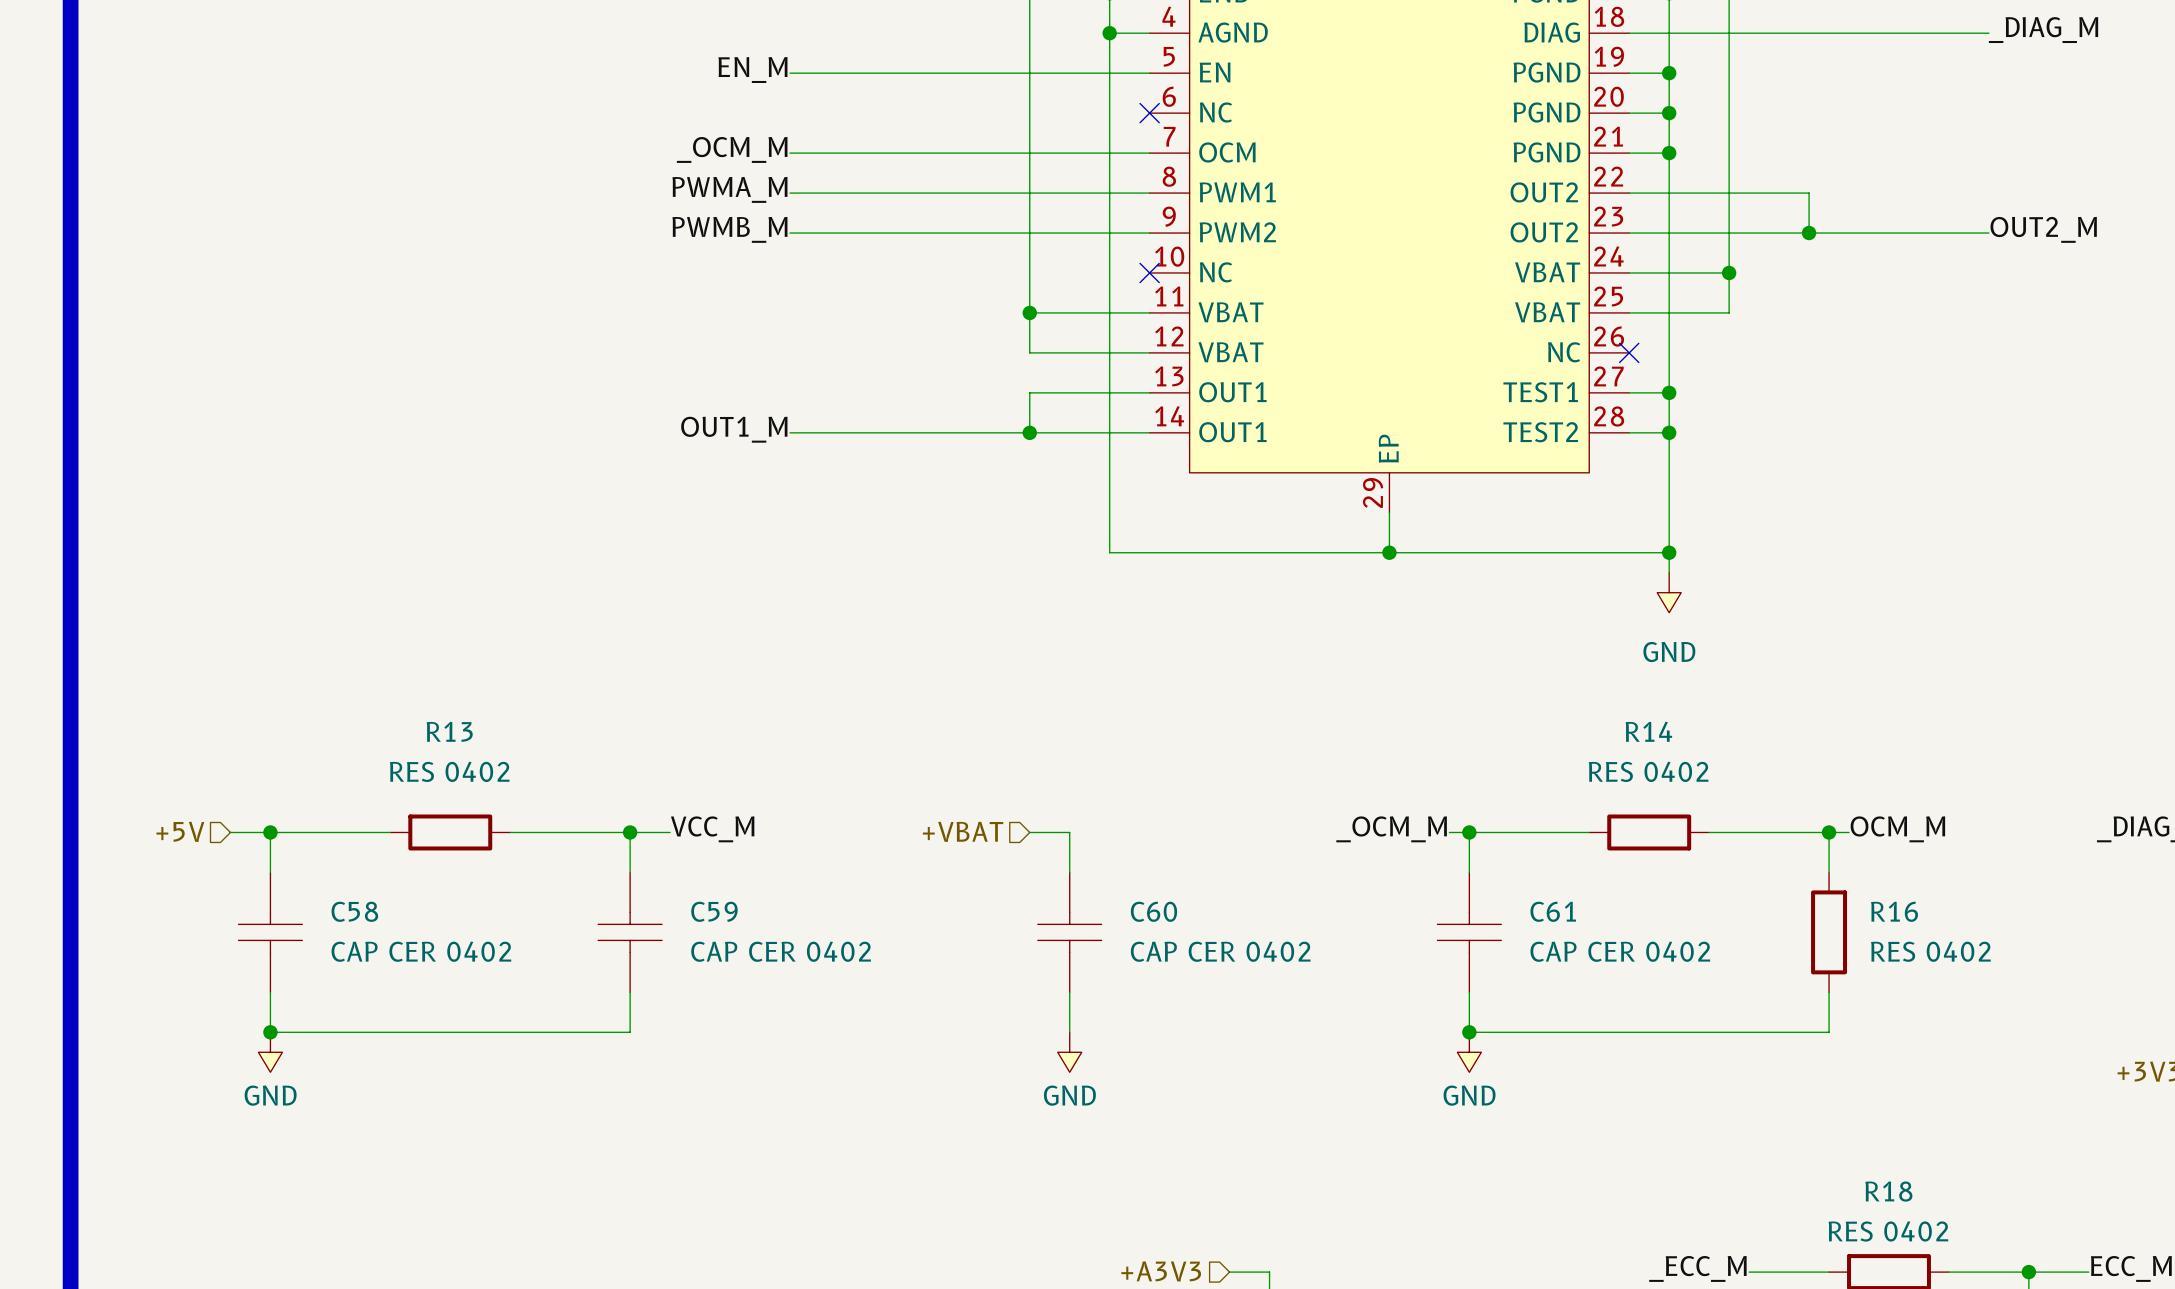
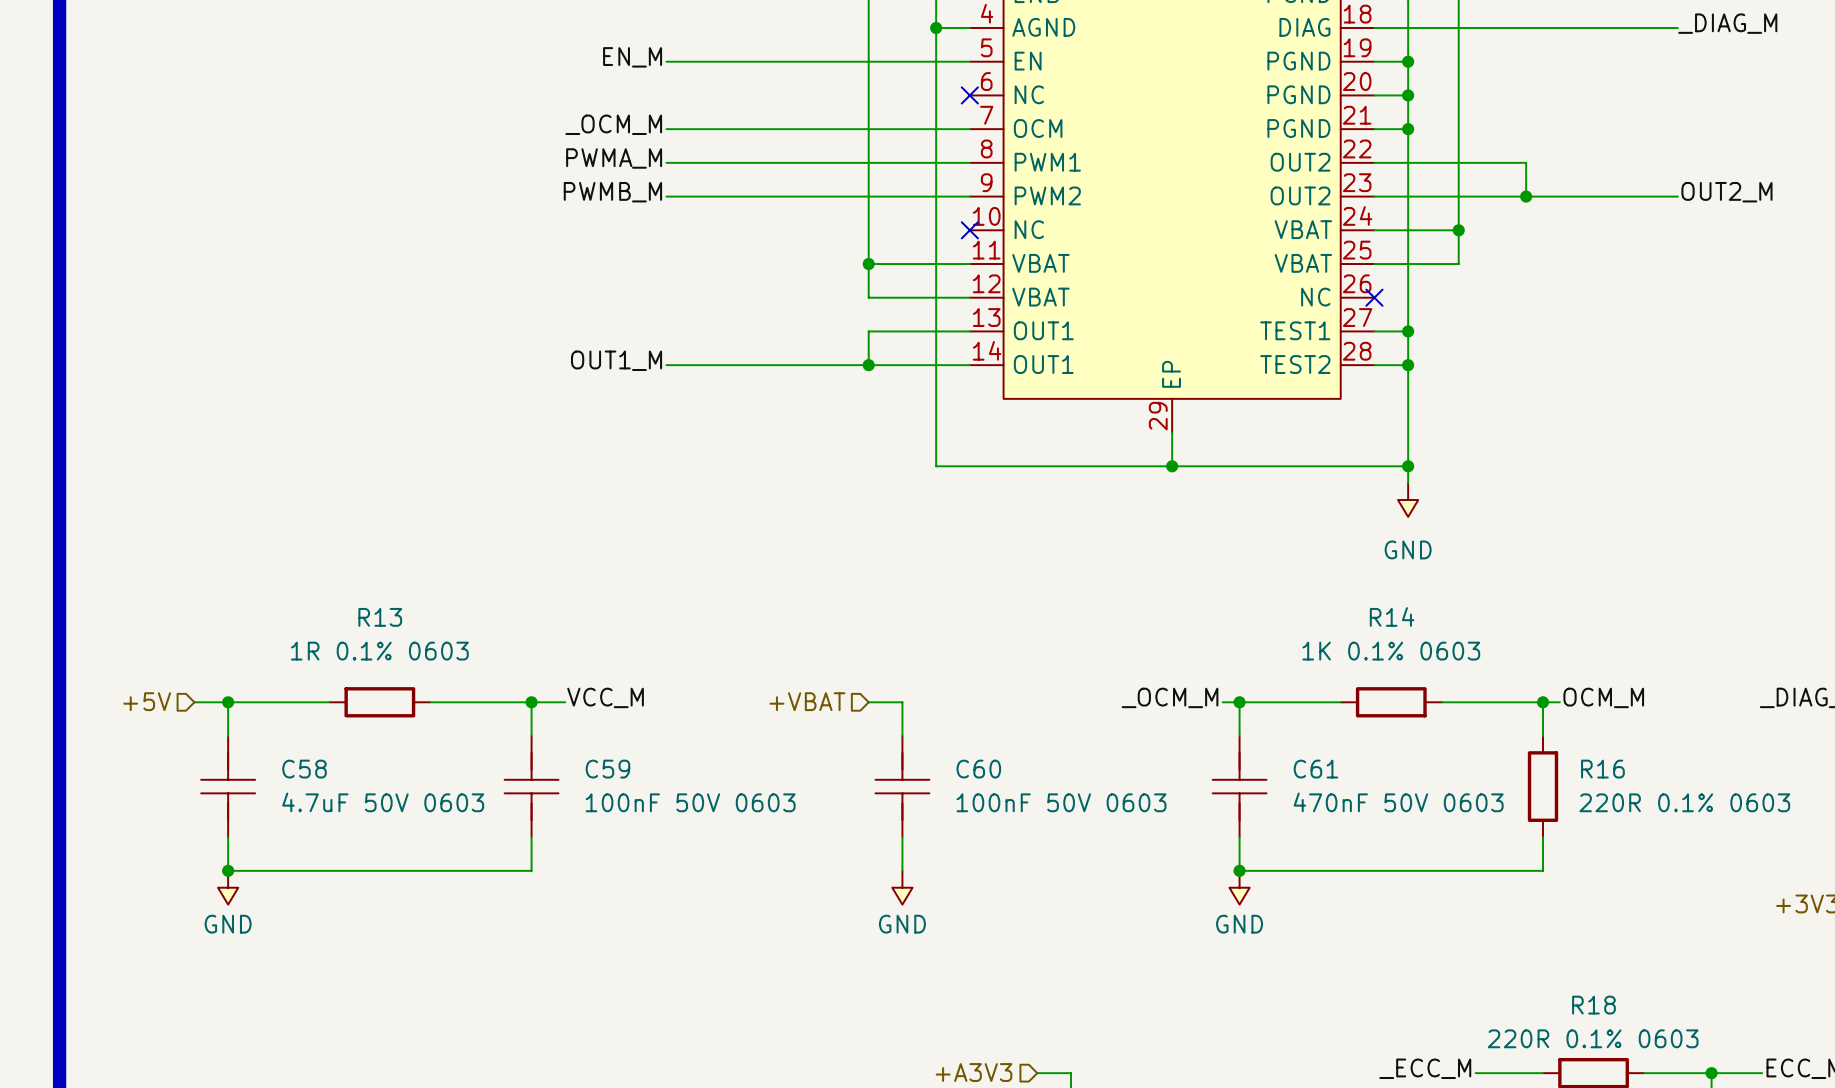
R13 value: RES 0402 (449, 771) -> 1R 0.1% 0603 (379, 651)
R14 value: RES 0402 (1648, 771) -> 1K 0.1% 0603 (1391, 651)
C58 symbol: [238, 872, 303, 993] -> [201, 736, 256, 838]
C59 symbol: [598, 872, 663, 993] -> [504, 736, 559, 838]
C60 symbol: [1037, 872, 1102, 993] -> [875, 736, 930, 838]
C61 symbol: [1437, 872, 1502, 993] -> [1212, 736, 1267, 838]
C58 value: CAP CER 0402 (421, 951) -> 4.7uF 50V 0603 (383, 802)
C59 value: CAP CER 0402 (781, 951) -> 100nF 50V 0603 (690, 802)
C60 value: CAP CER 0402 (1220, 951) -> 100nF 50V 0603 (1061, 802)
C61 value: CAP CER 0402 (1620, 951) -> 470nF 50V 0603 (1398, 802)
R16 value: RES 0402 (1930, 951) -> 220R 0.1% 0603 (1684, 802)
R18 value: RES 0402 (1888, 1231) -> 220R 0.1% 0603 (1593, 1038)

